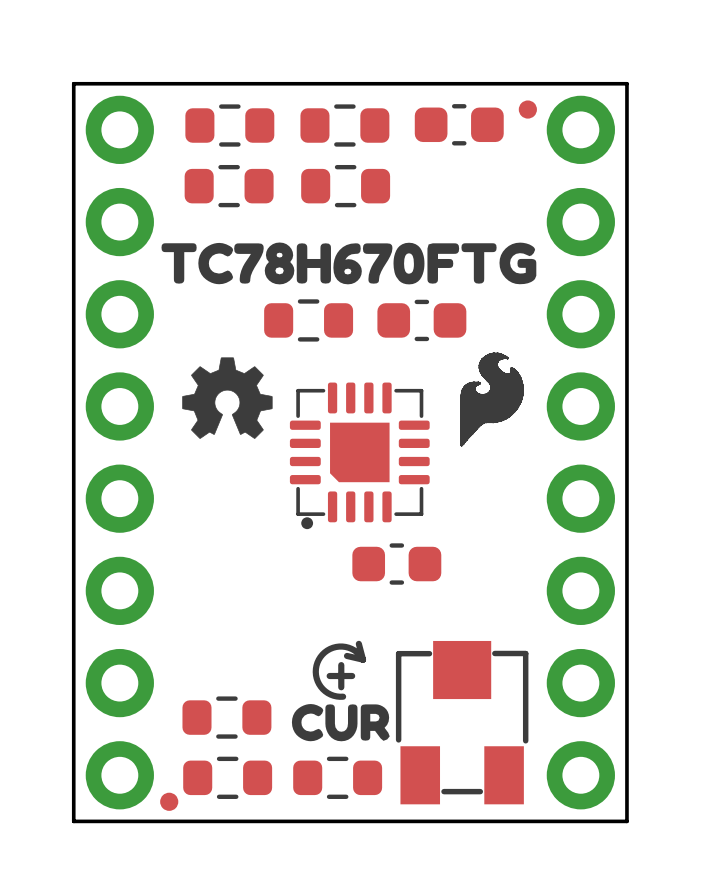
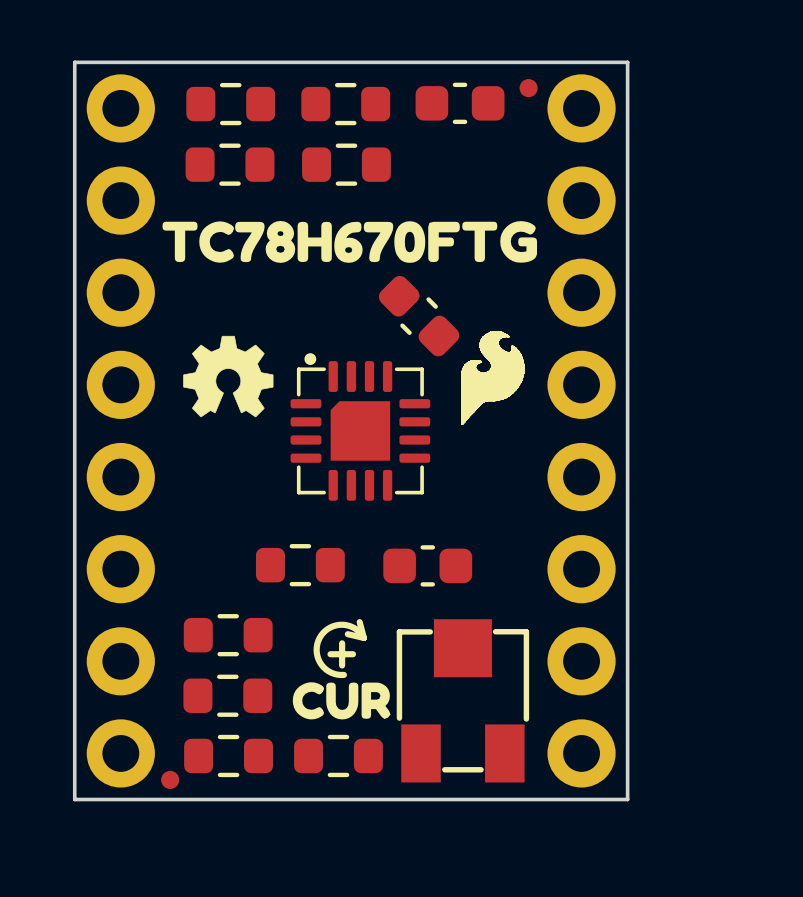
part: (308, 320) -> none
part rotation: 0° (421, 320) -> 45° clockwise (419, 316)
part footprint: [289, 382, 430, 530] -> [290, 353, 431, 501]
part position: (396, 564) -> (427, 565)
part: none -> (300, 565)
part: none -> (228, 635)

